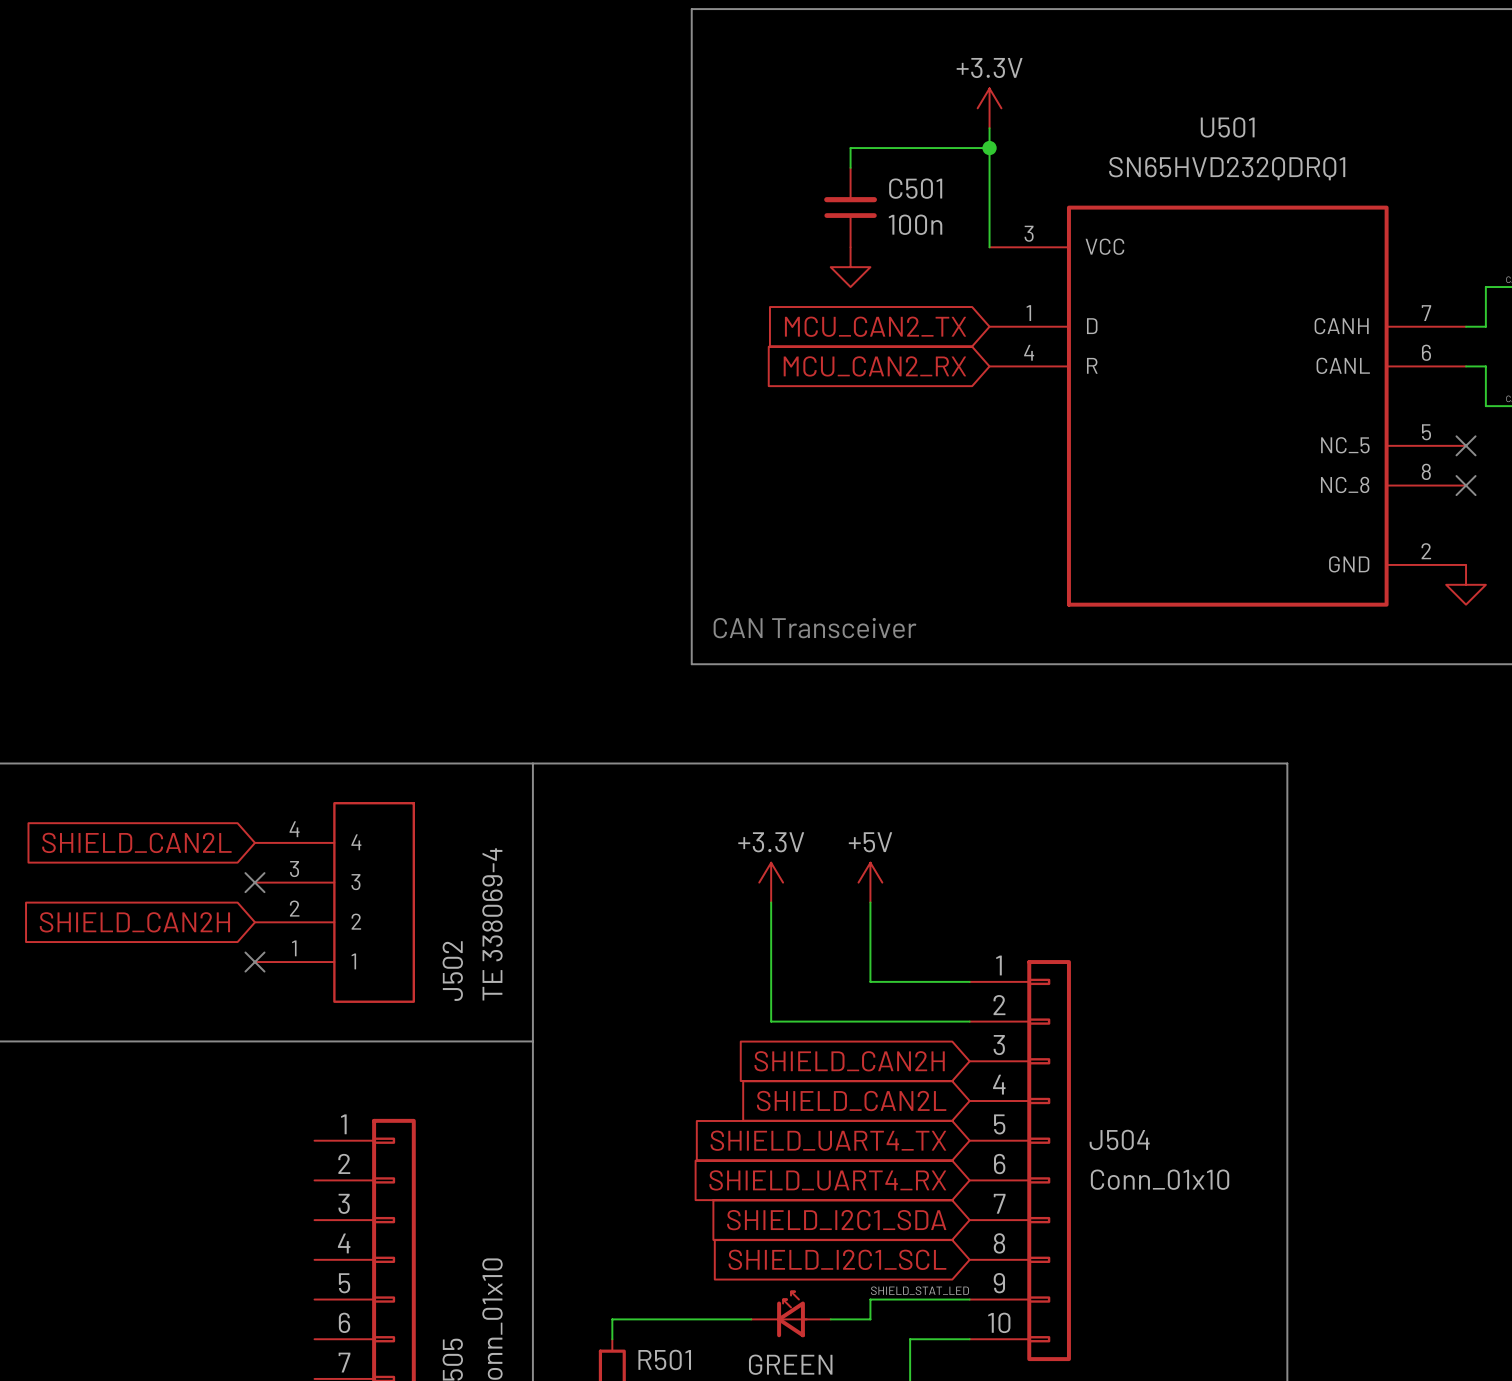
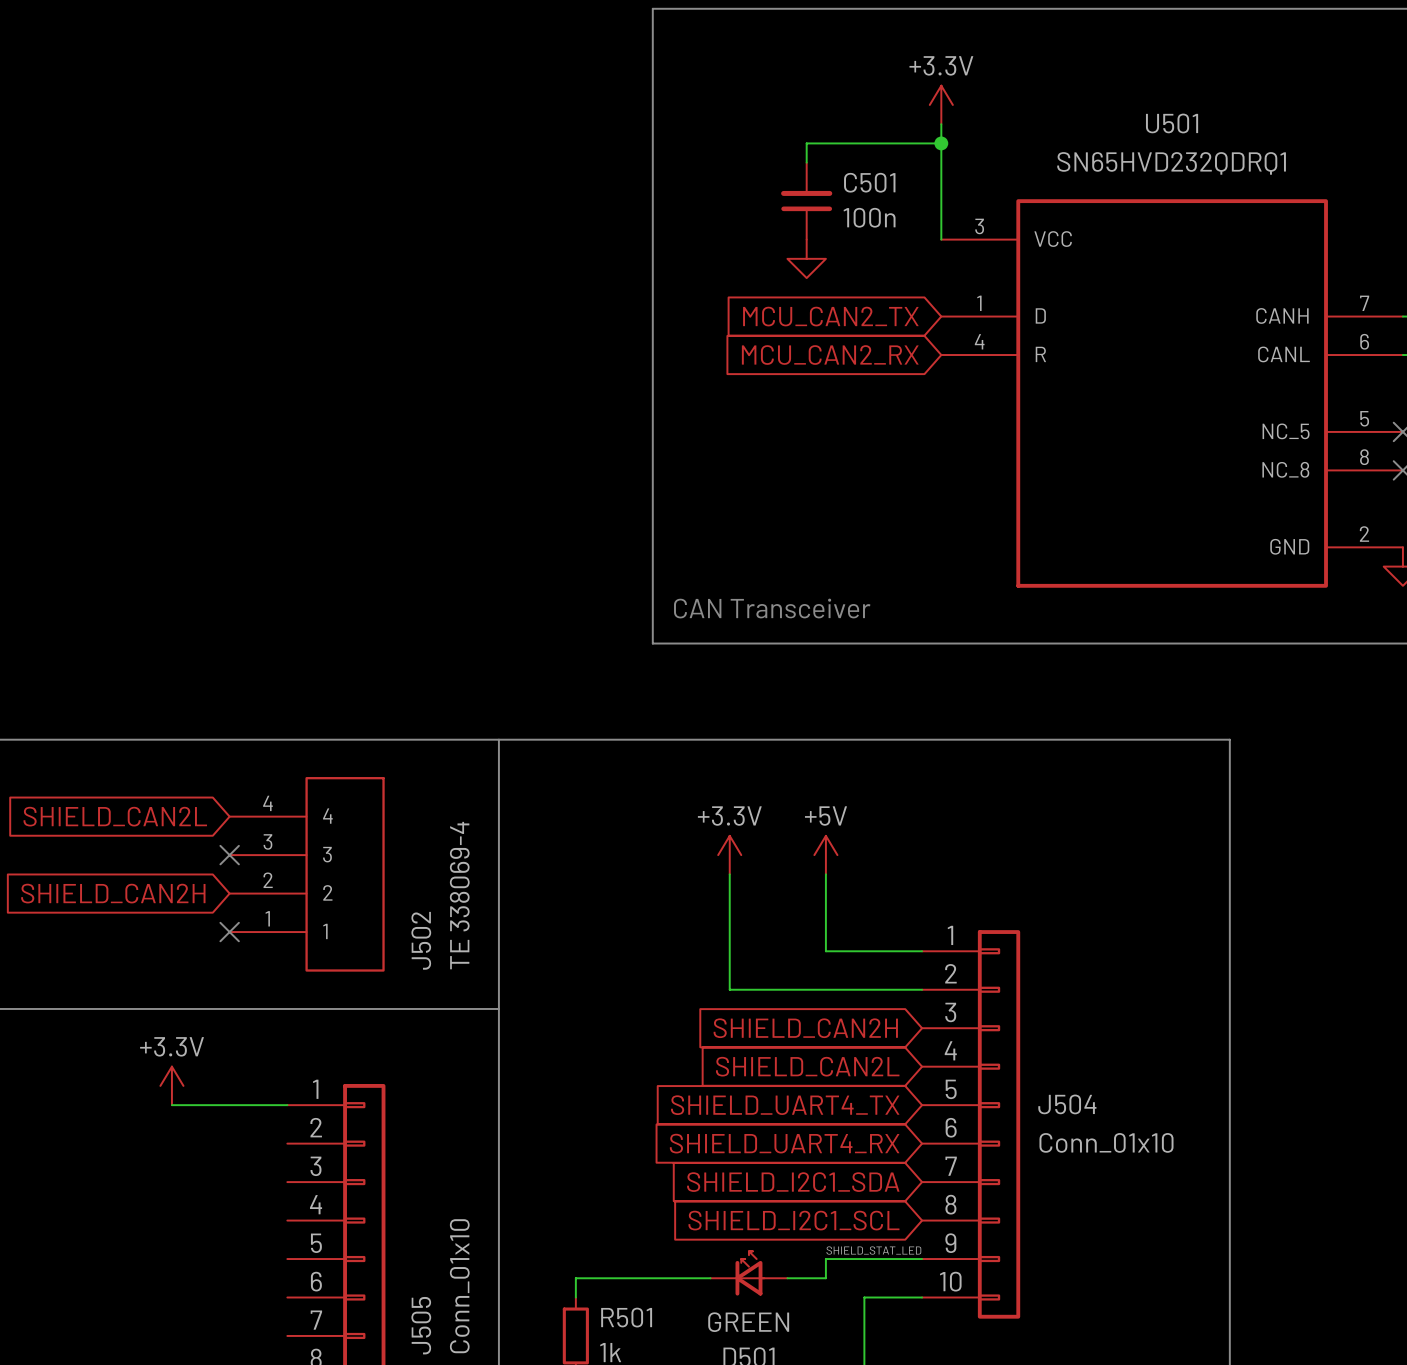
power symbol: none -> +3.3V (171, 1085)
wire: none -> (171, 1105) (287, 1105)

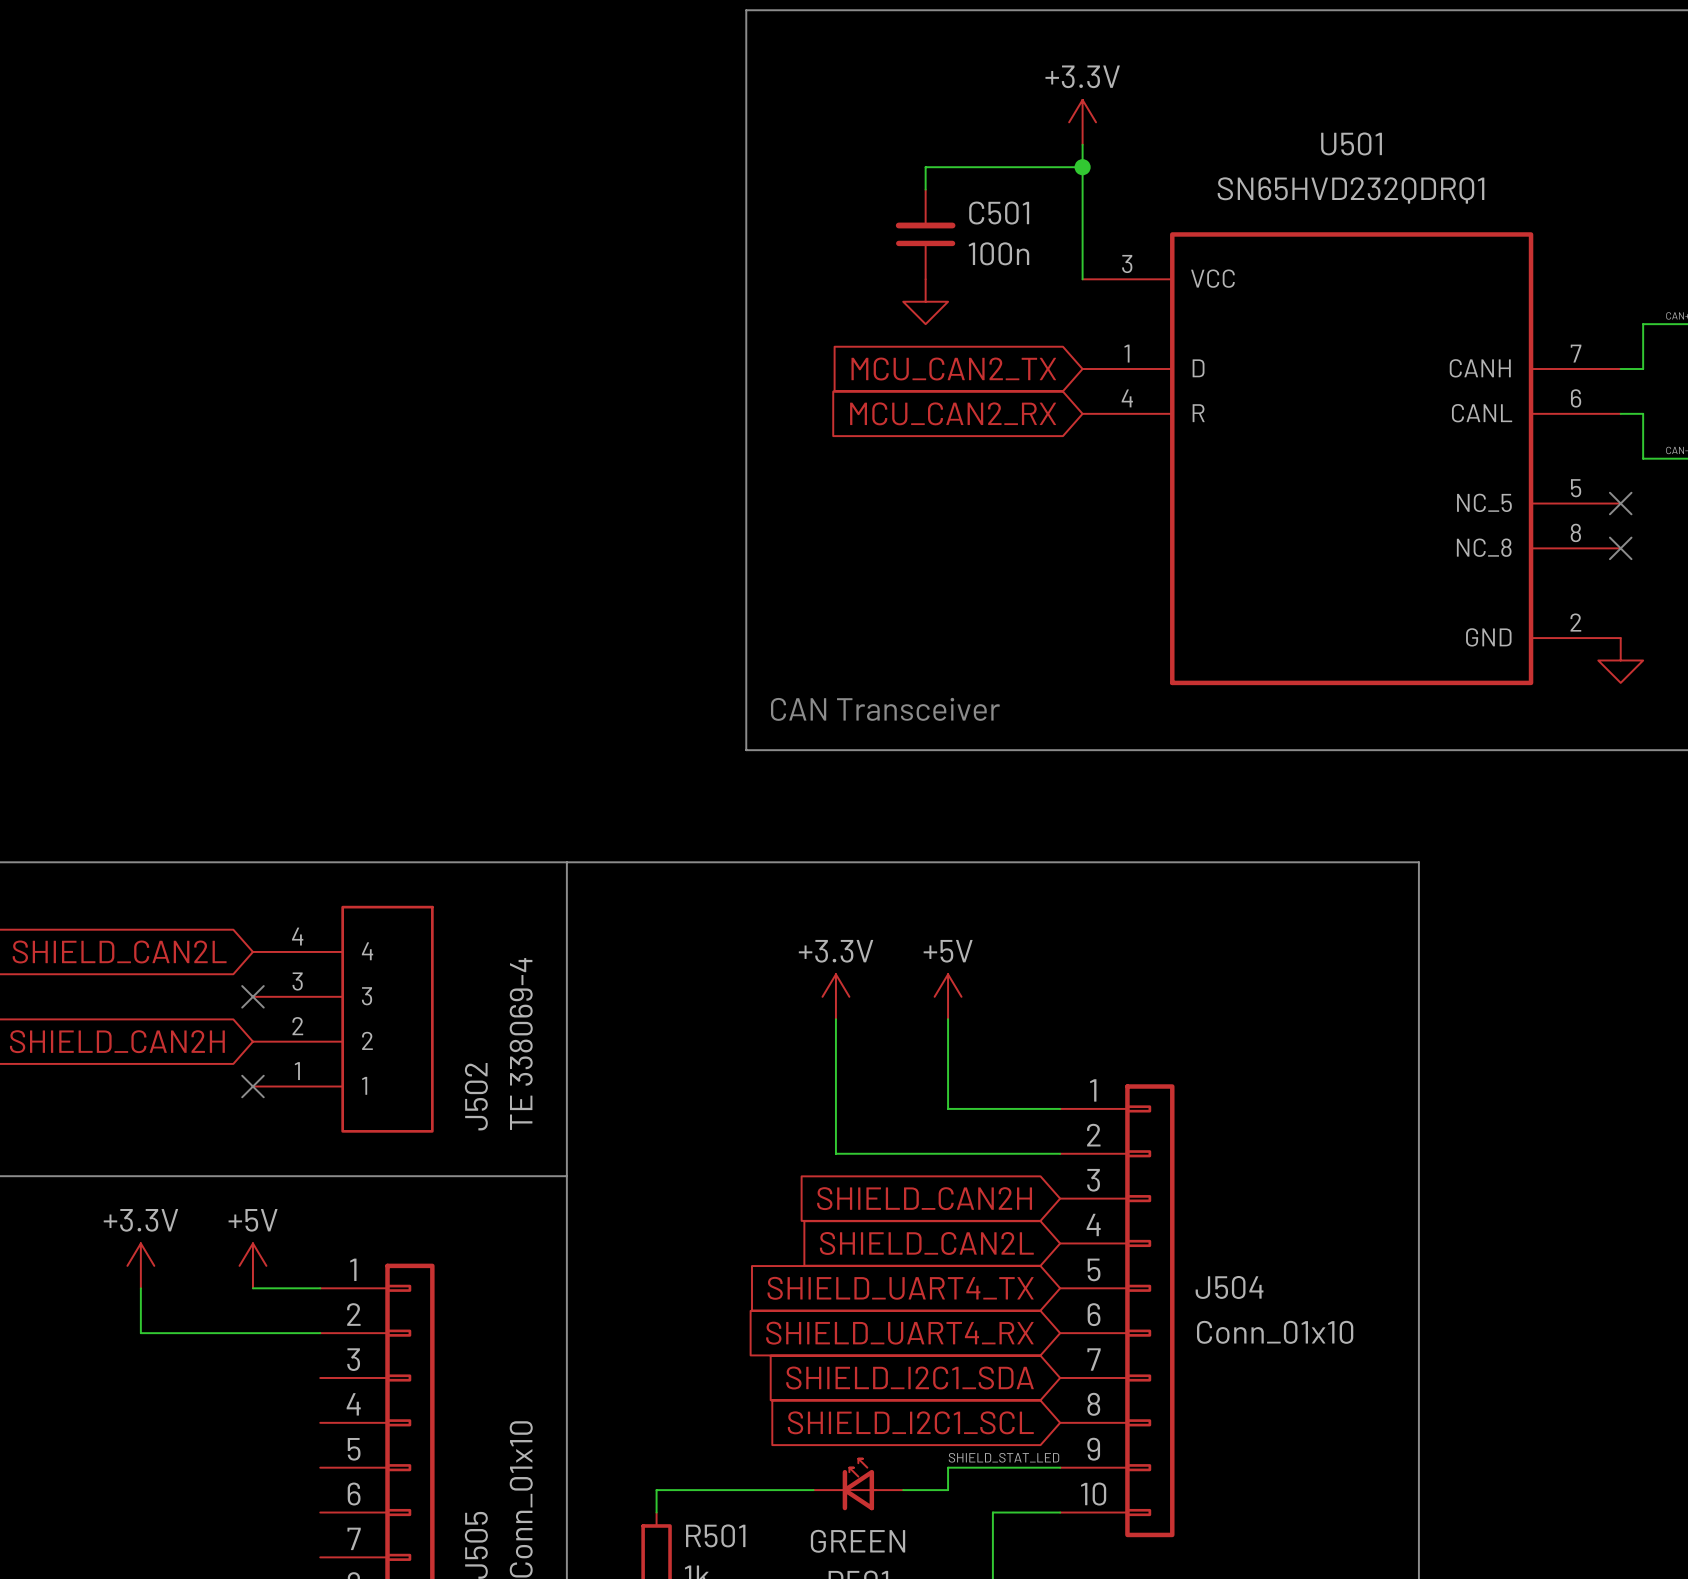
power symbol position: +3.3V (171, 1085) -> +3.3V (140, 1265)
power symbol: none -> +5V (252, 1265)
wire: none -> (140, 1288) (140, 1333) (320, 1333)
wire: (171, 1105) (229, 1105) -> none

